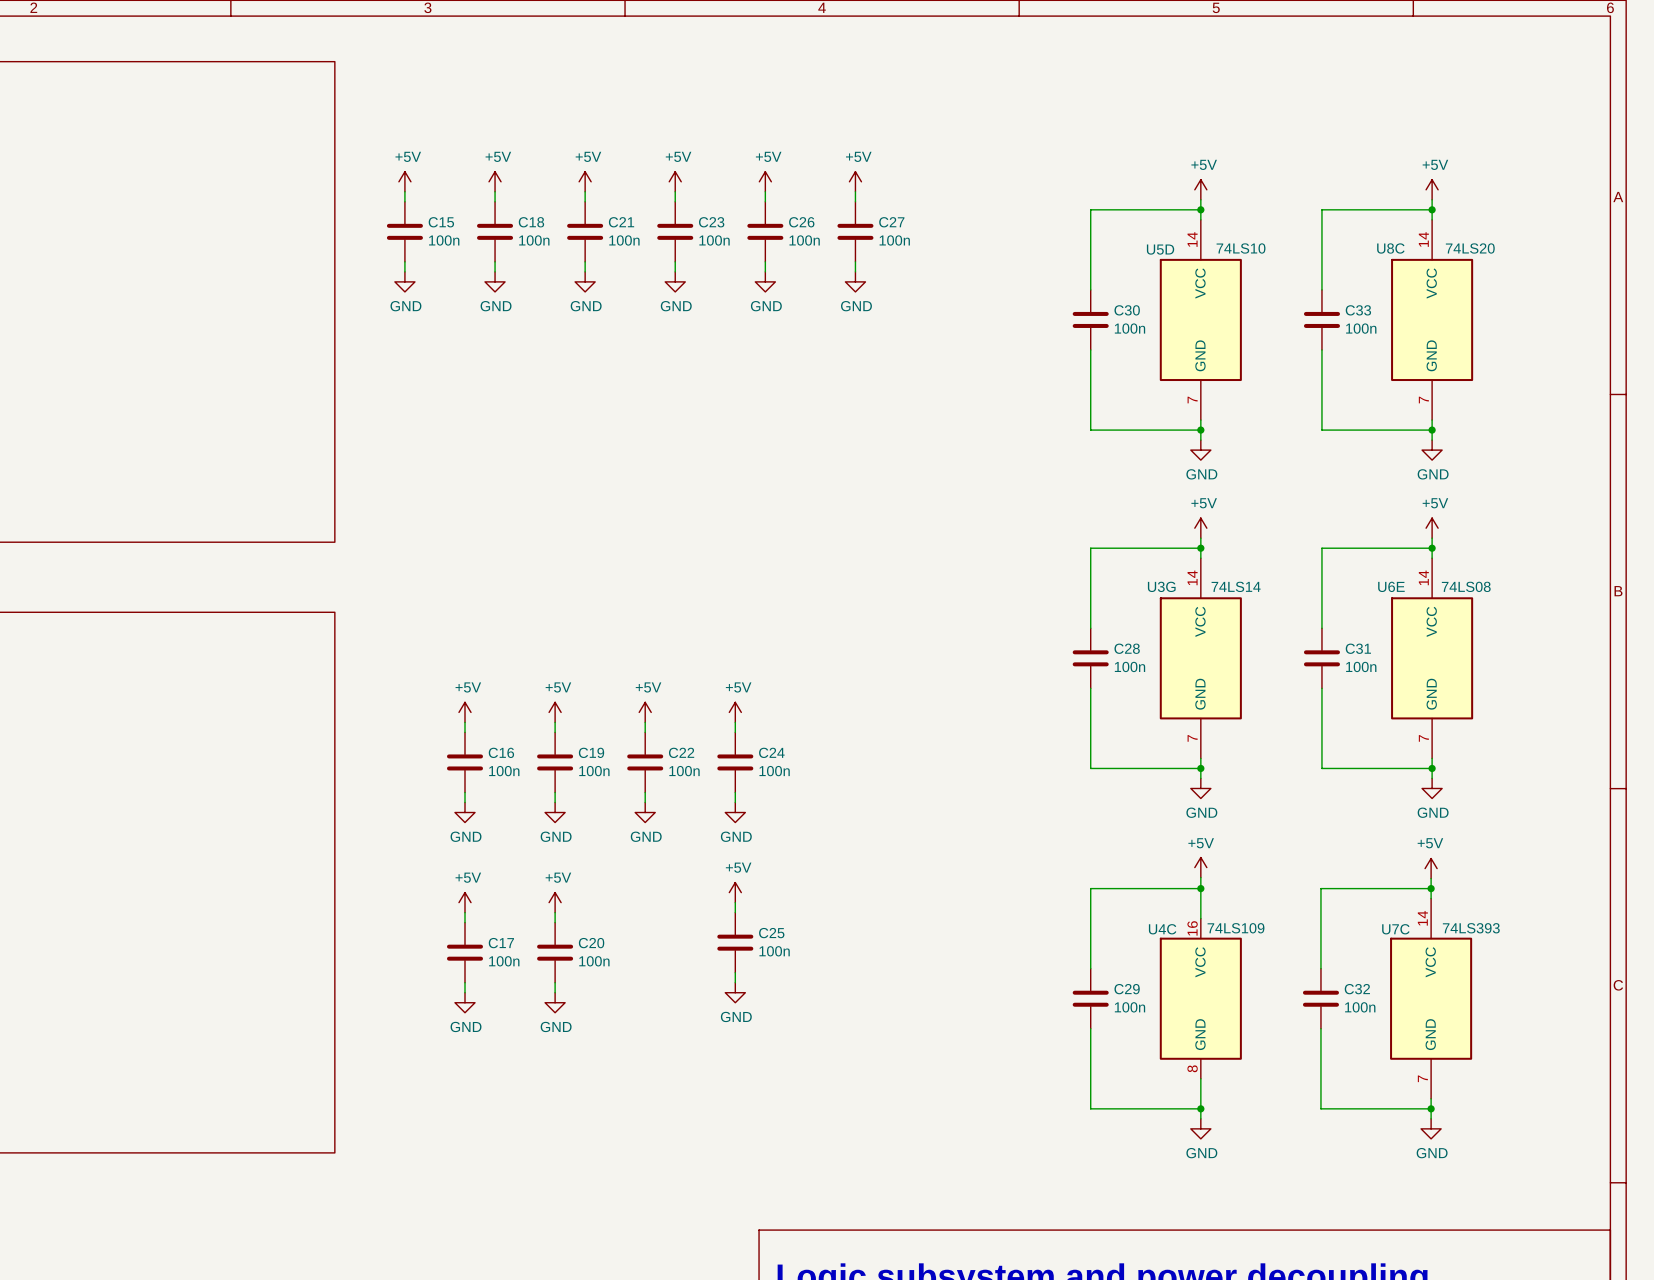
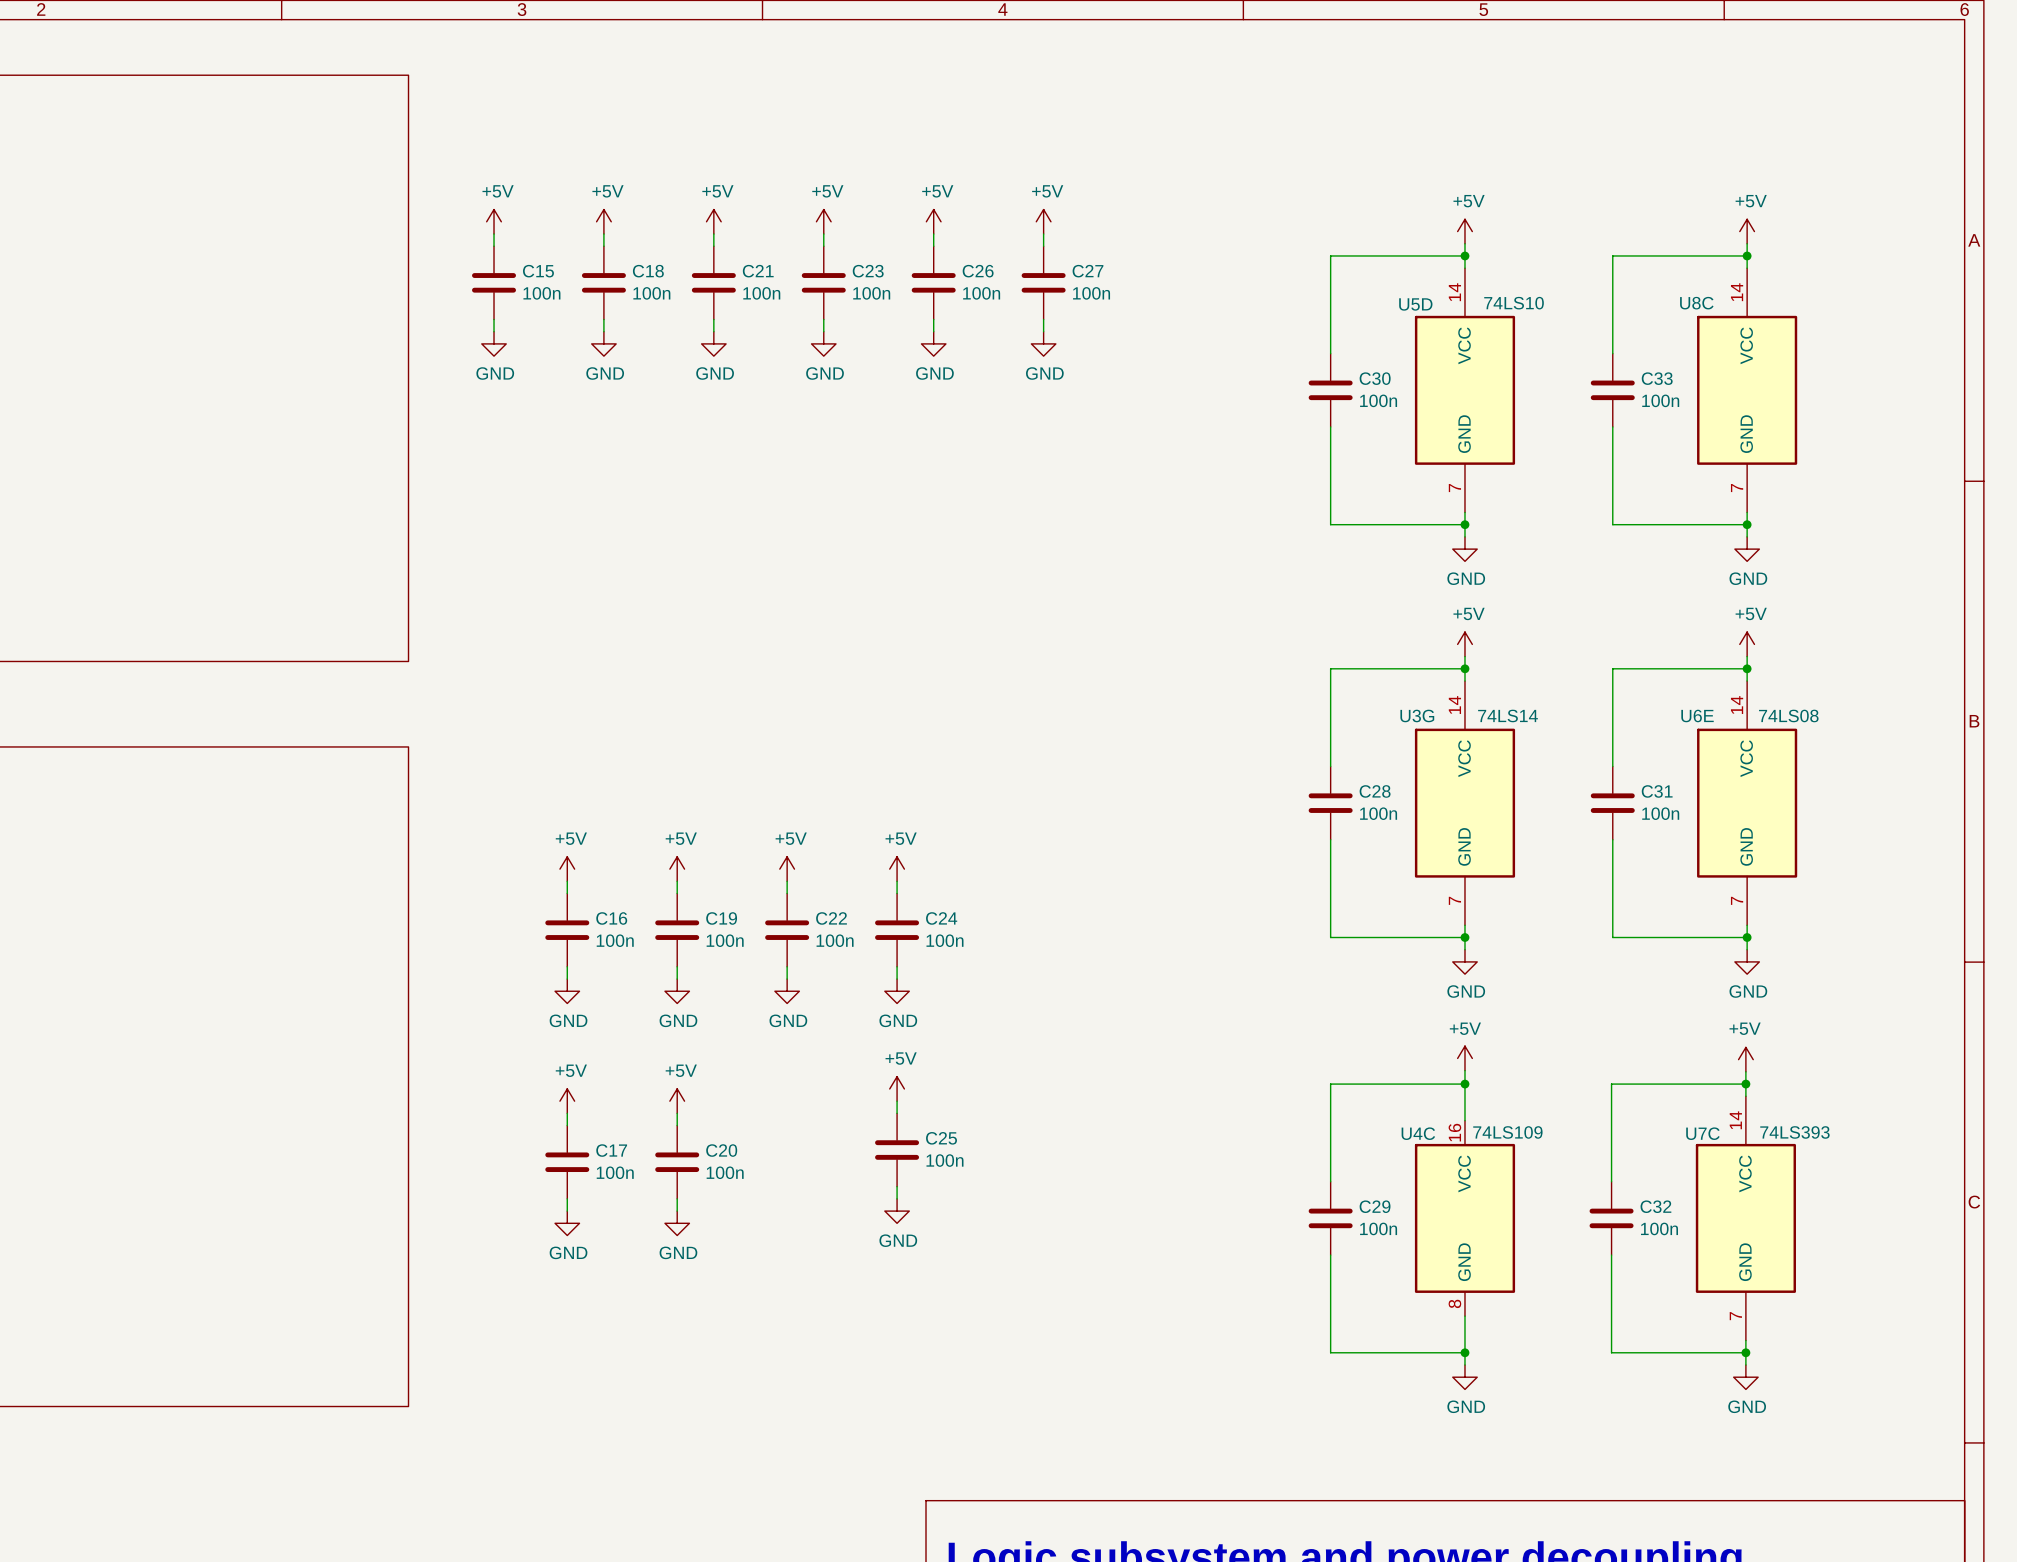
U8C value: 74LS20 (1470, 248) -> none

